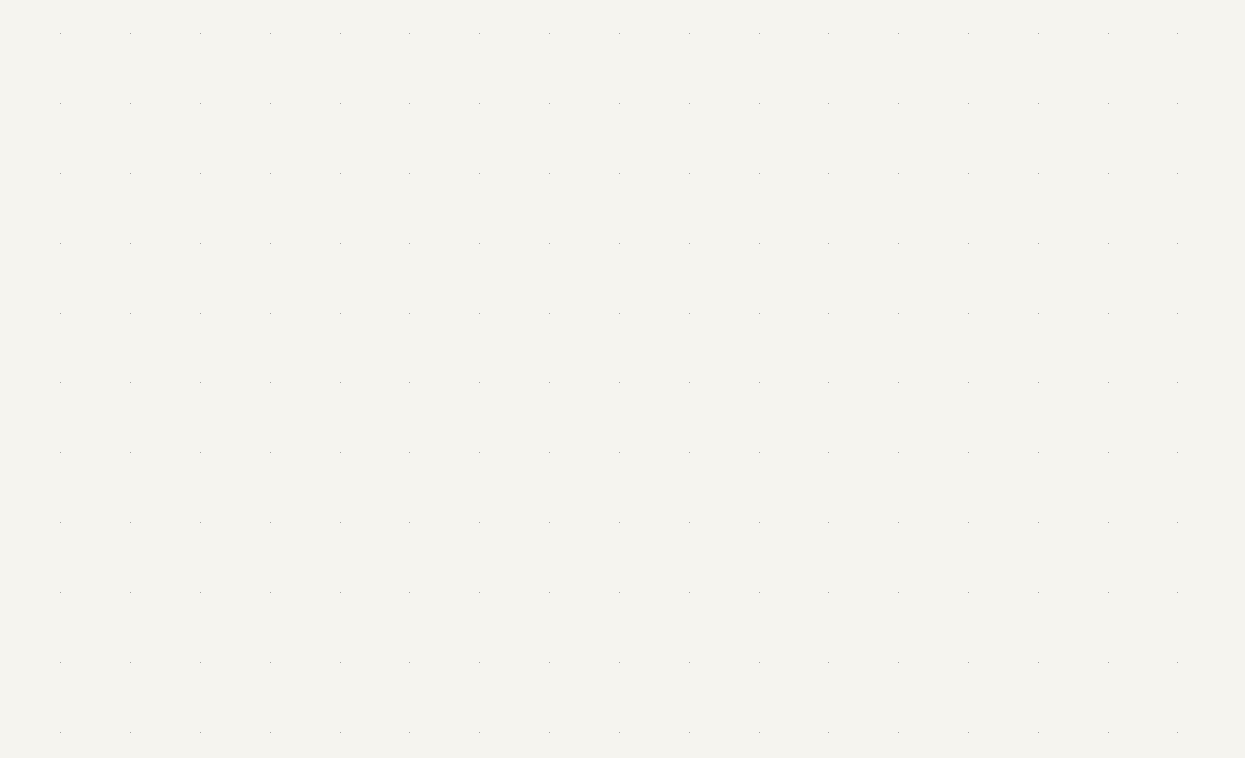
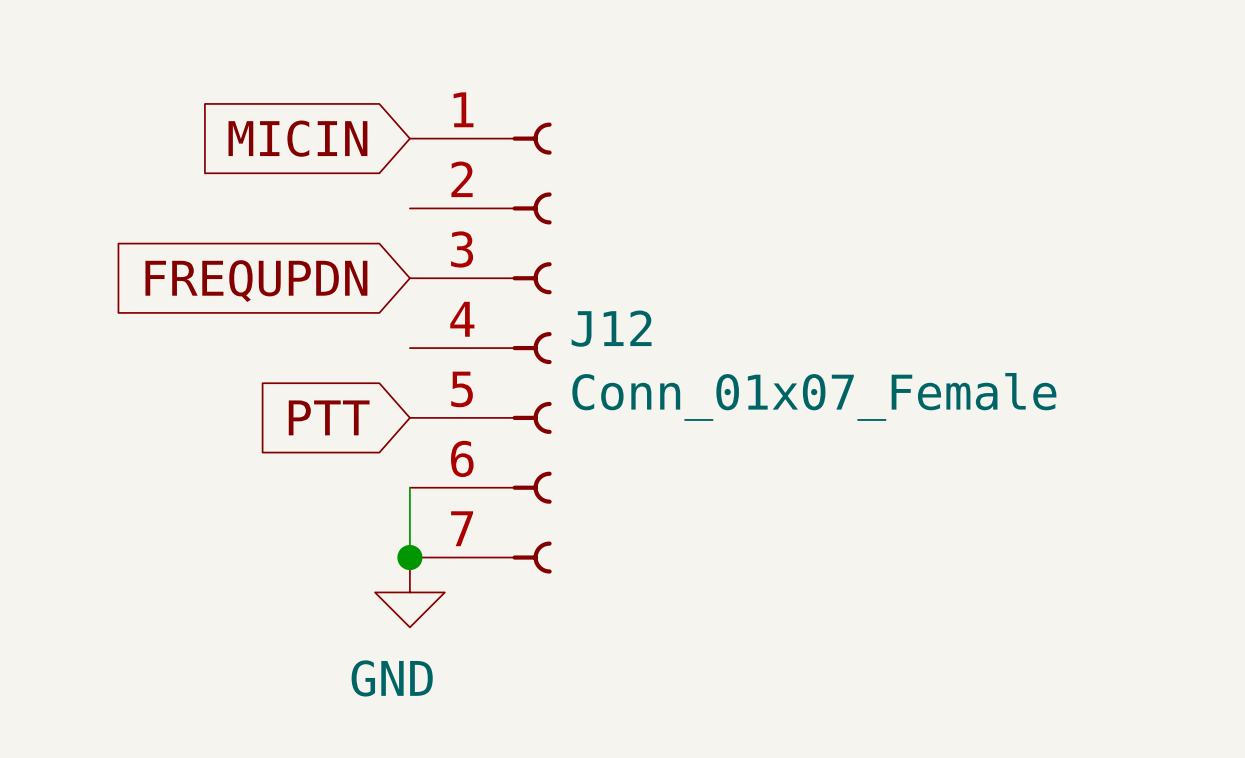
global label: none -> MICIN (297, 138)
global label: none -> FREQUPDN (256, 281)
J12: none -> Conn_01x07_Female (480, 348)
global label: none -> PTT (329, 417)
wire: none -> (409, 487) (409, 557)
junction: none -> (409, 557)
power symbol: none -> GND (409, 592)

